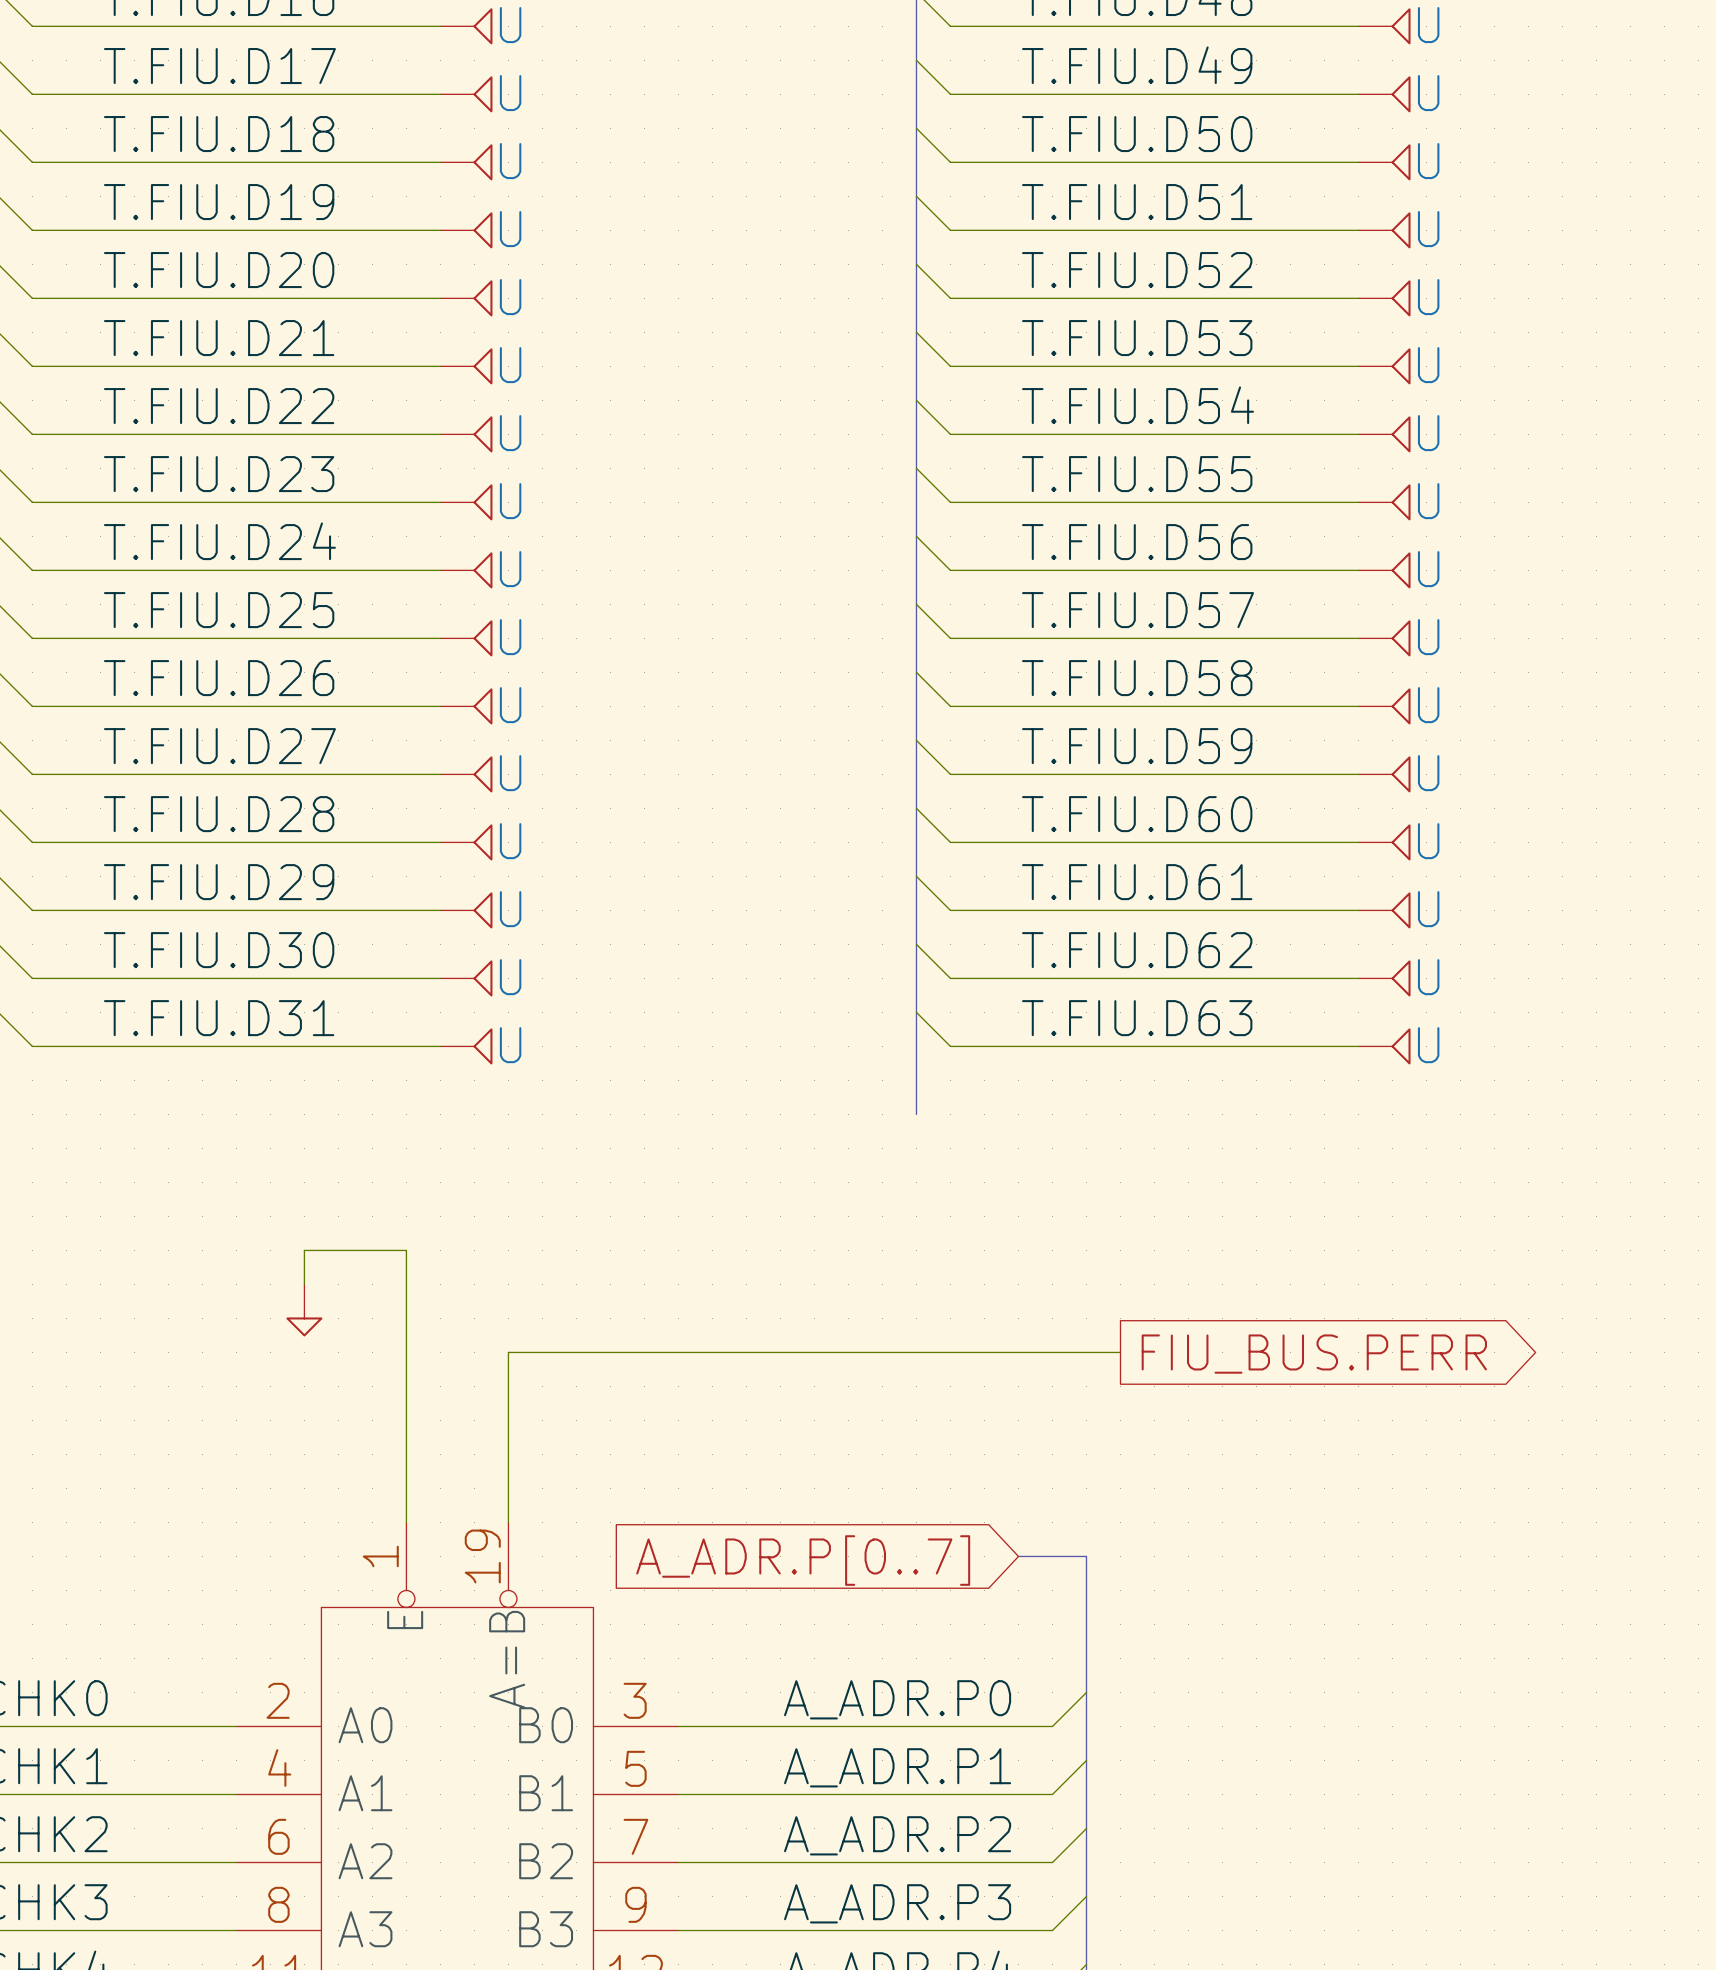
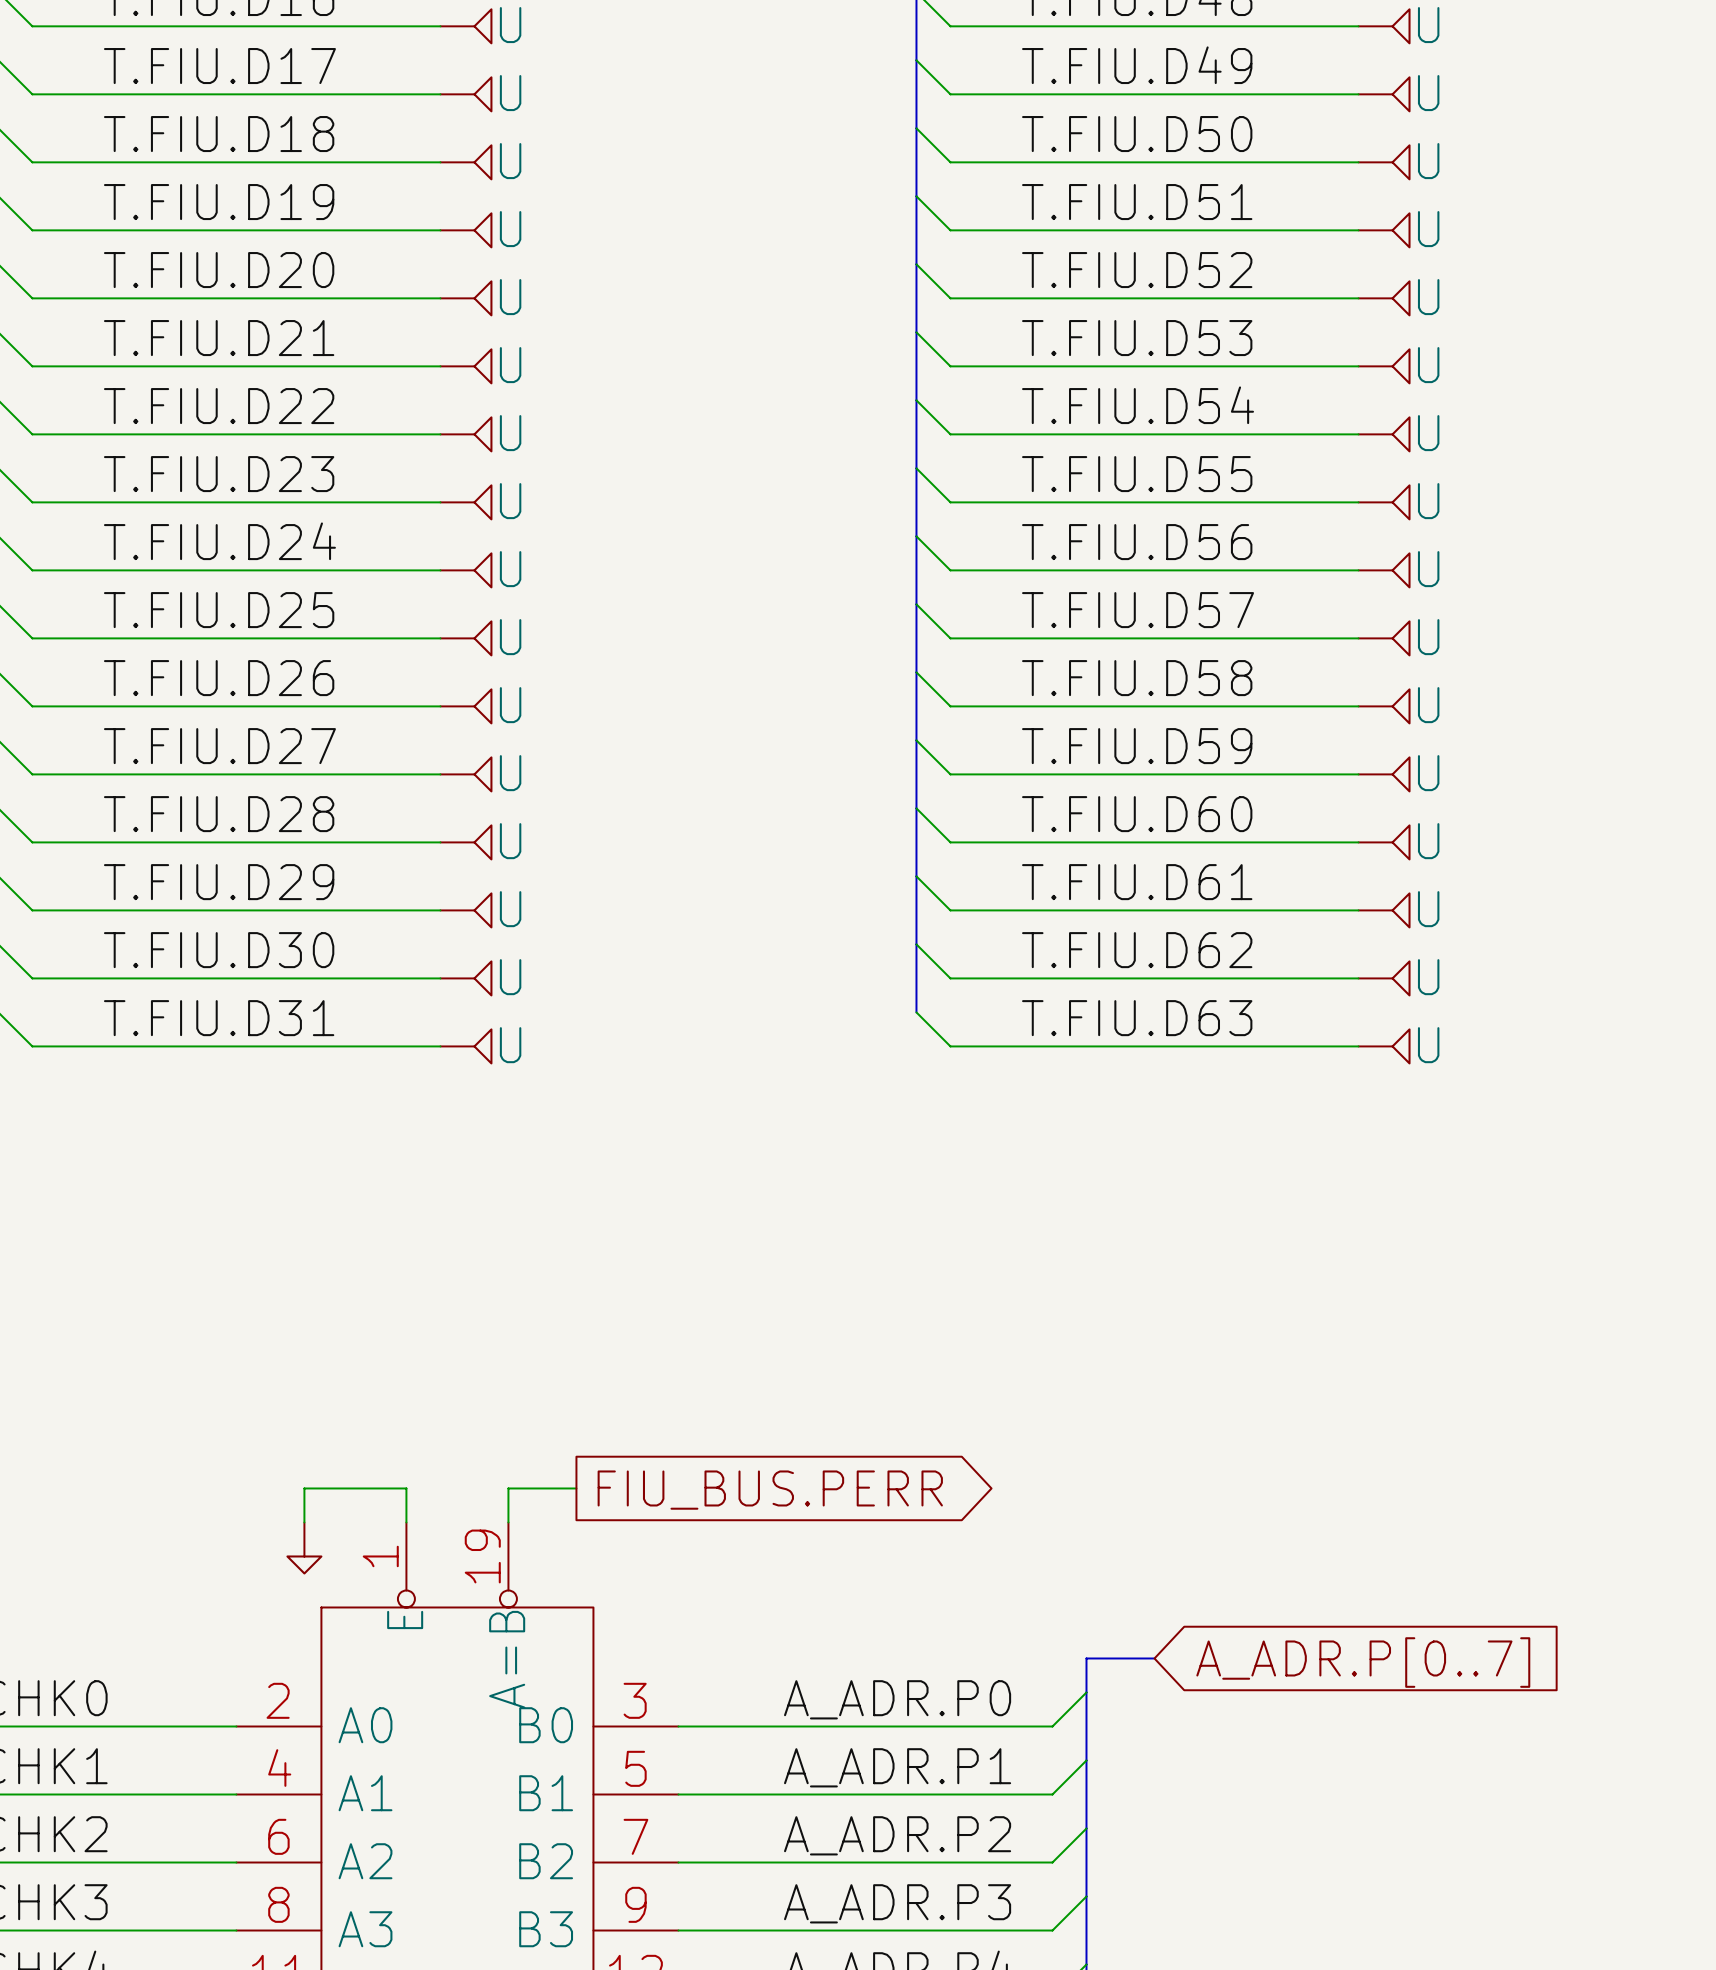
bus: (916, 1012) (916, 1114) -> none
wire: (304, 1284) (304, 1250) (406, 1250) (406, 1488) -> (304, 1522) (304, 1488) (406, 1488)
power symbol position: (304, 1310) -> (304, 1548)
wire: (1120, 1352) (508, 1352) (508, 1488) -> (576, 1488) (508, 1488)
global label: FIU_BUS.PERR (1314, 1354) -> none
global label: none -> FIU_BUS.PERR (770, 1490)
bus: (1018, 1556) (1086, 1556) (1086, 1658) -> (1154, 1658) (1086, 1658)
global label rotation: 0° (803, 1560) -> 180° (1363, 1662)
global label position: A_ADR.P[0..7] (803, 1560) -> A_ADR.P[0..7] (1363, 1662)

